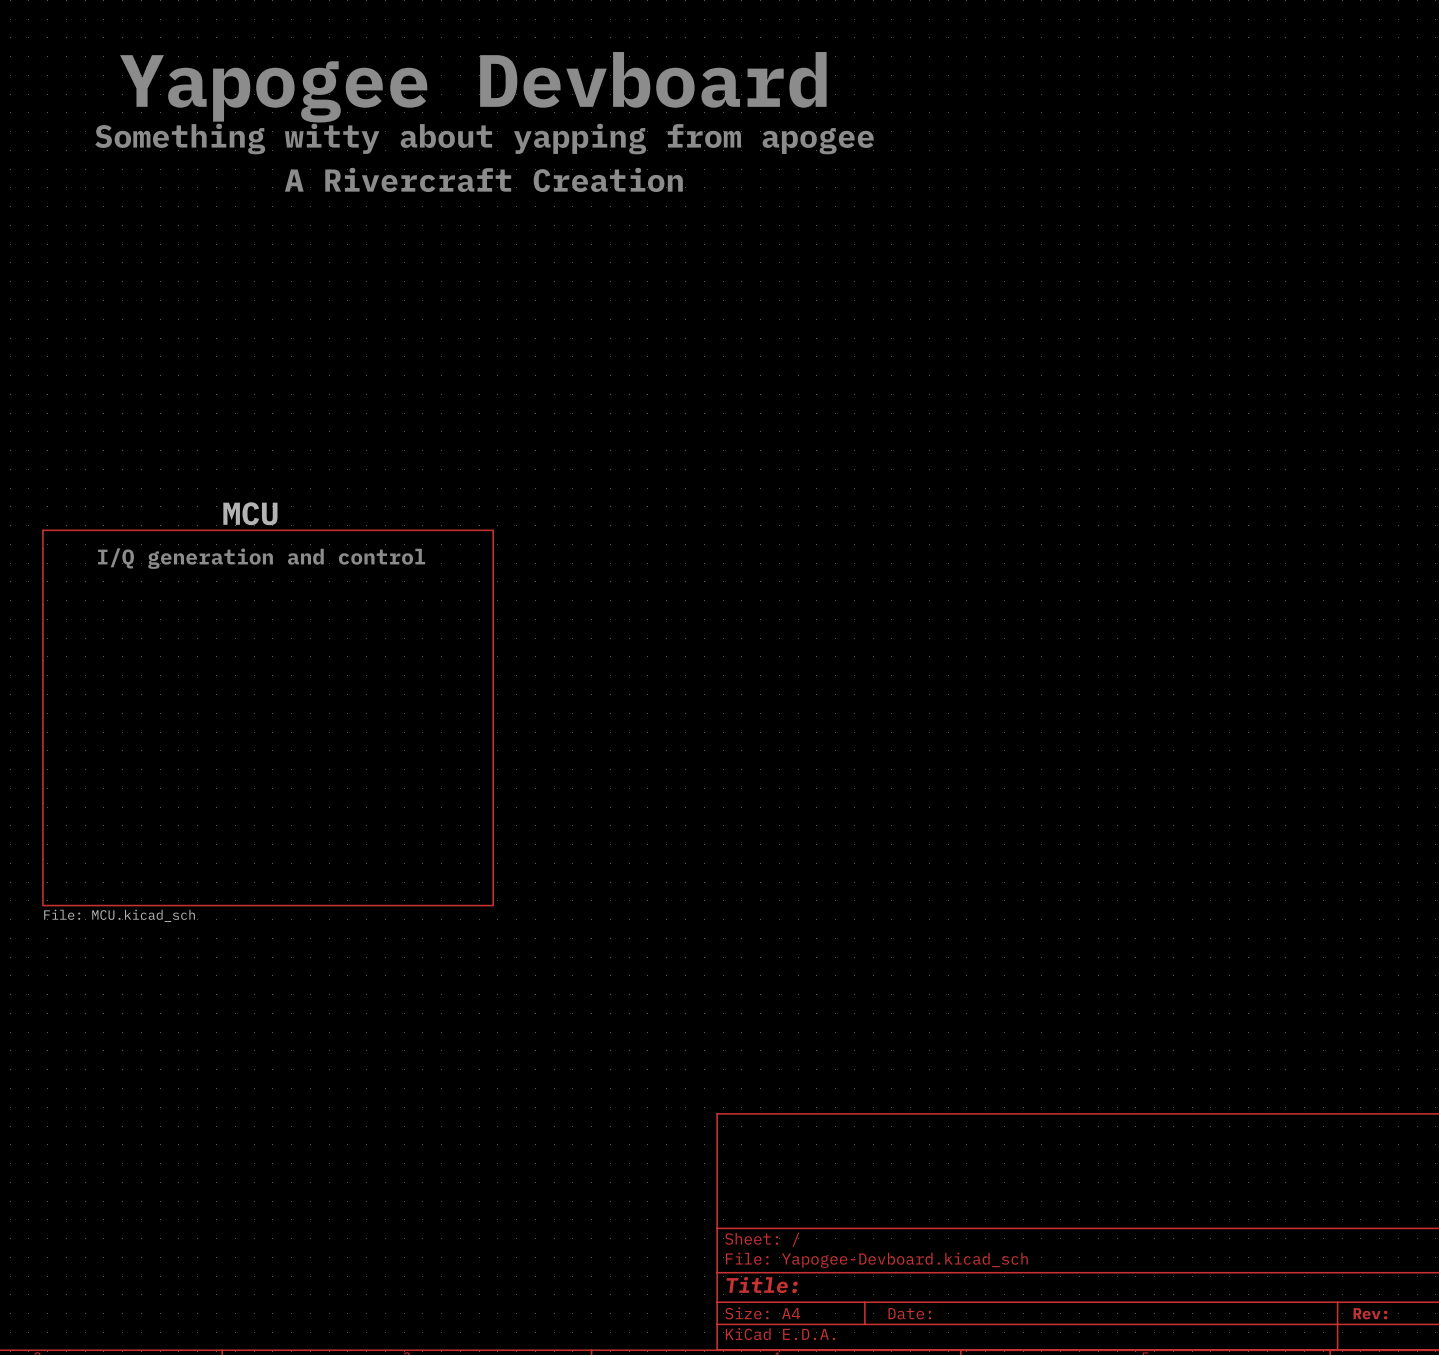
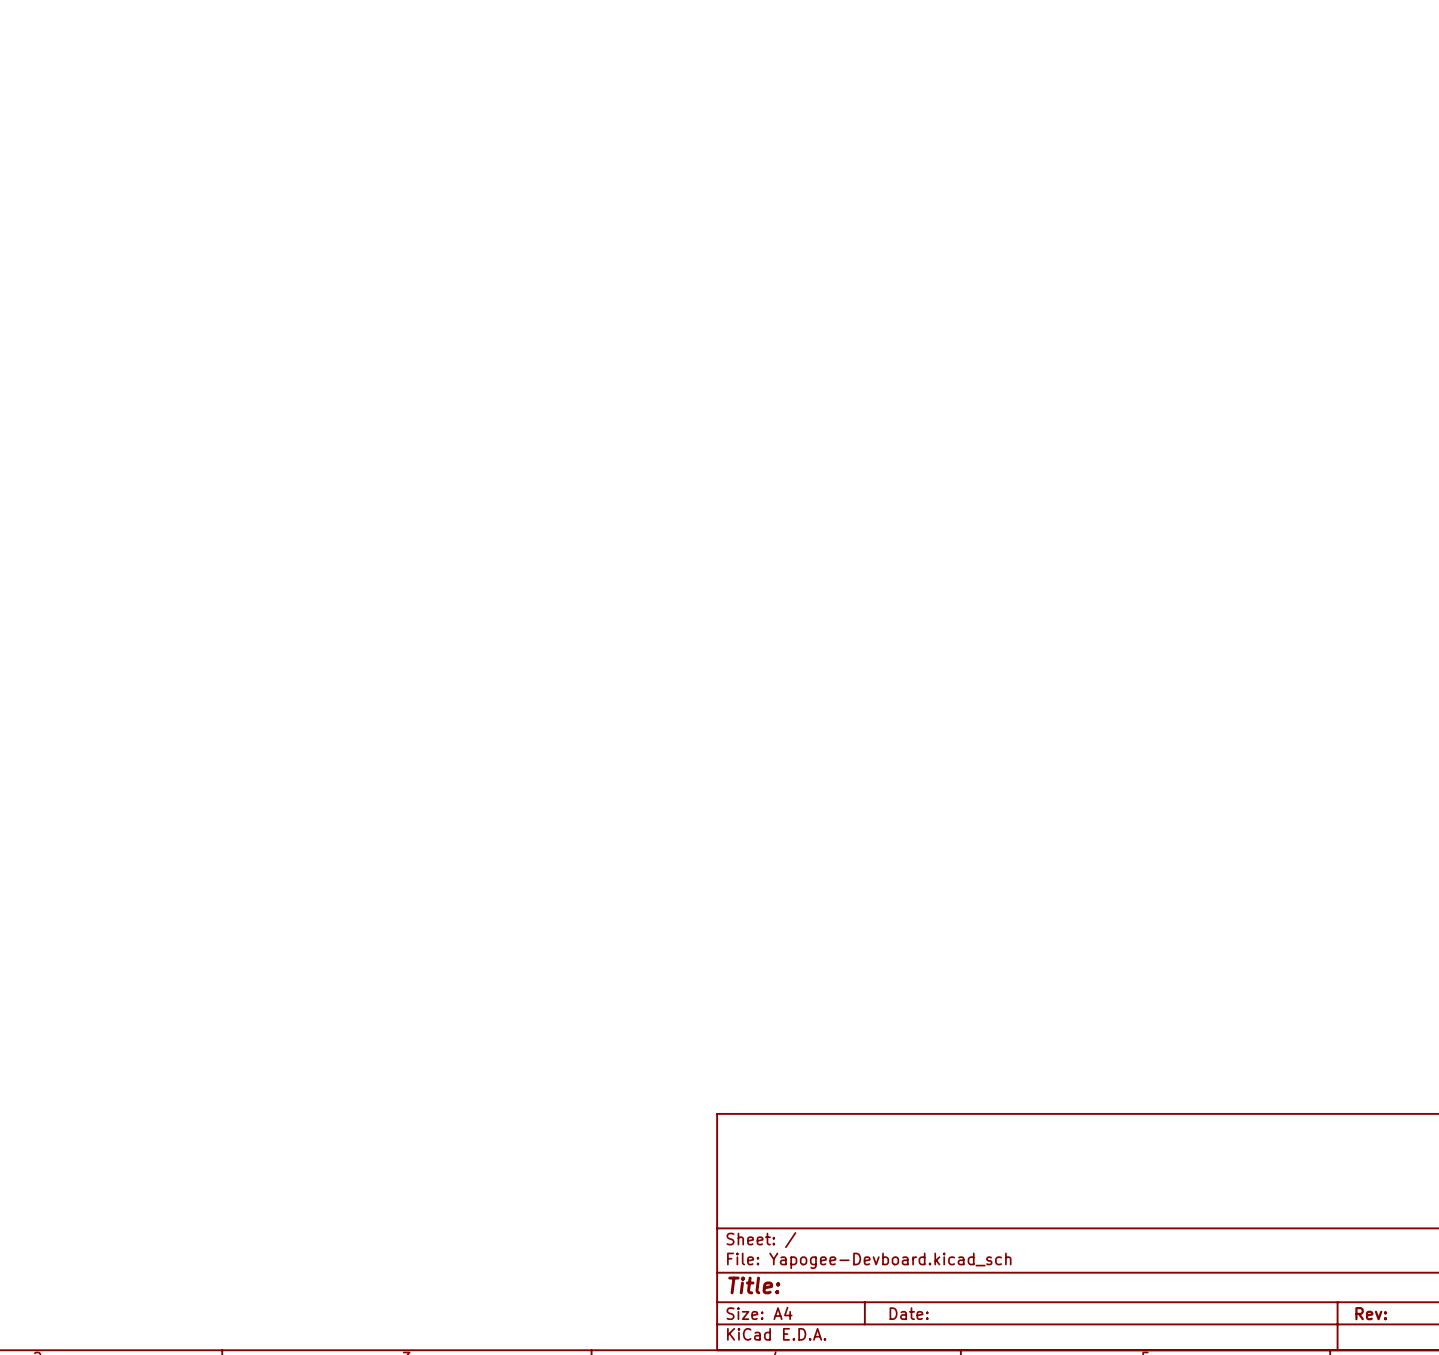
text: Yapogee Devboard (473, 87) -> none
text: Something witty about yapping from apogee (484, 139) -> none
text: A Rivercraft Creation (483, 179) -> none
text: I/Q generation and control (261, 558) -> none
sheet MCU: File: MCU.kicad_sch (268, 717) -> none

